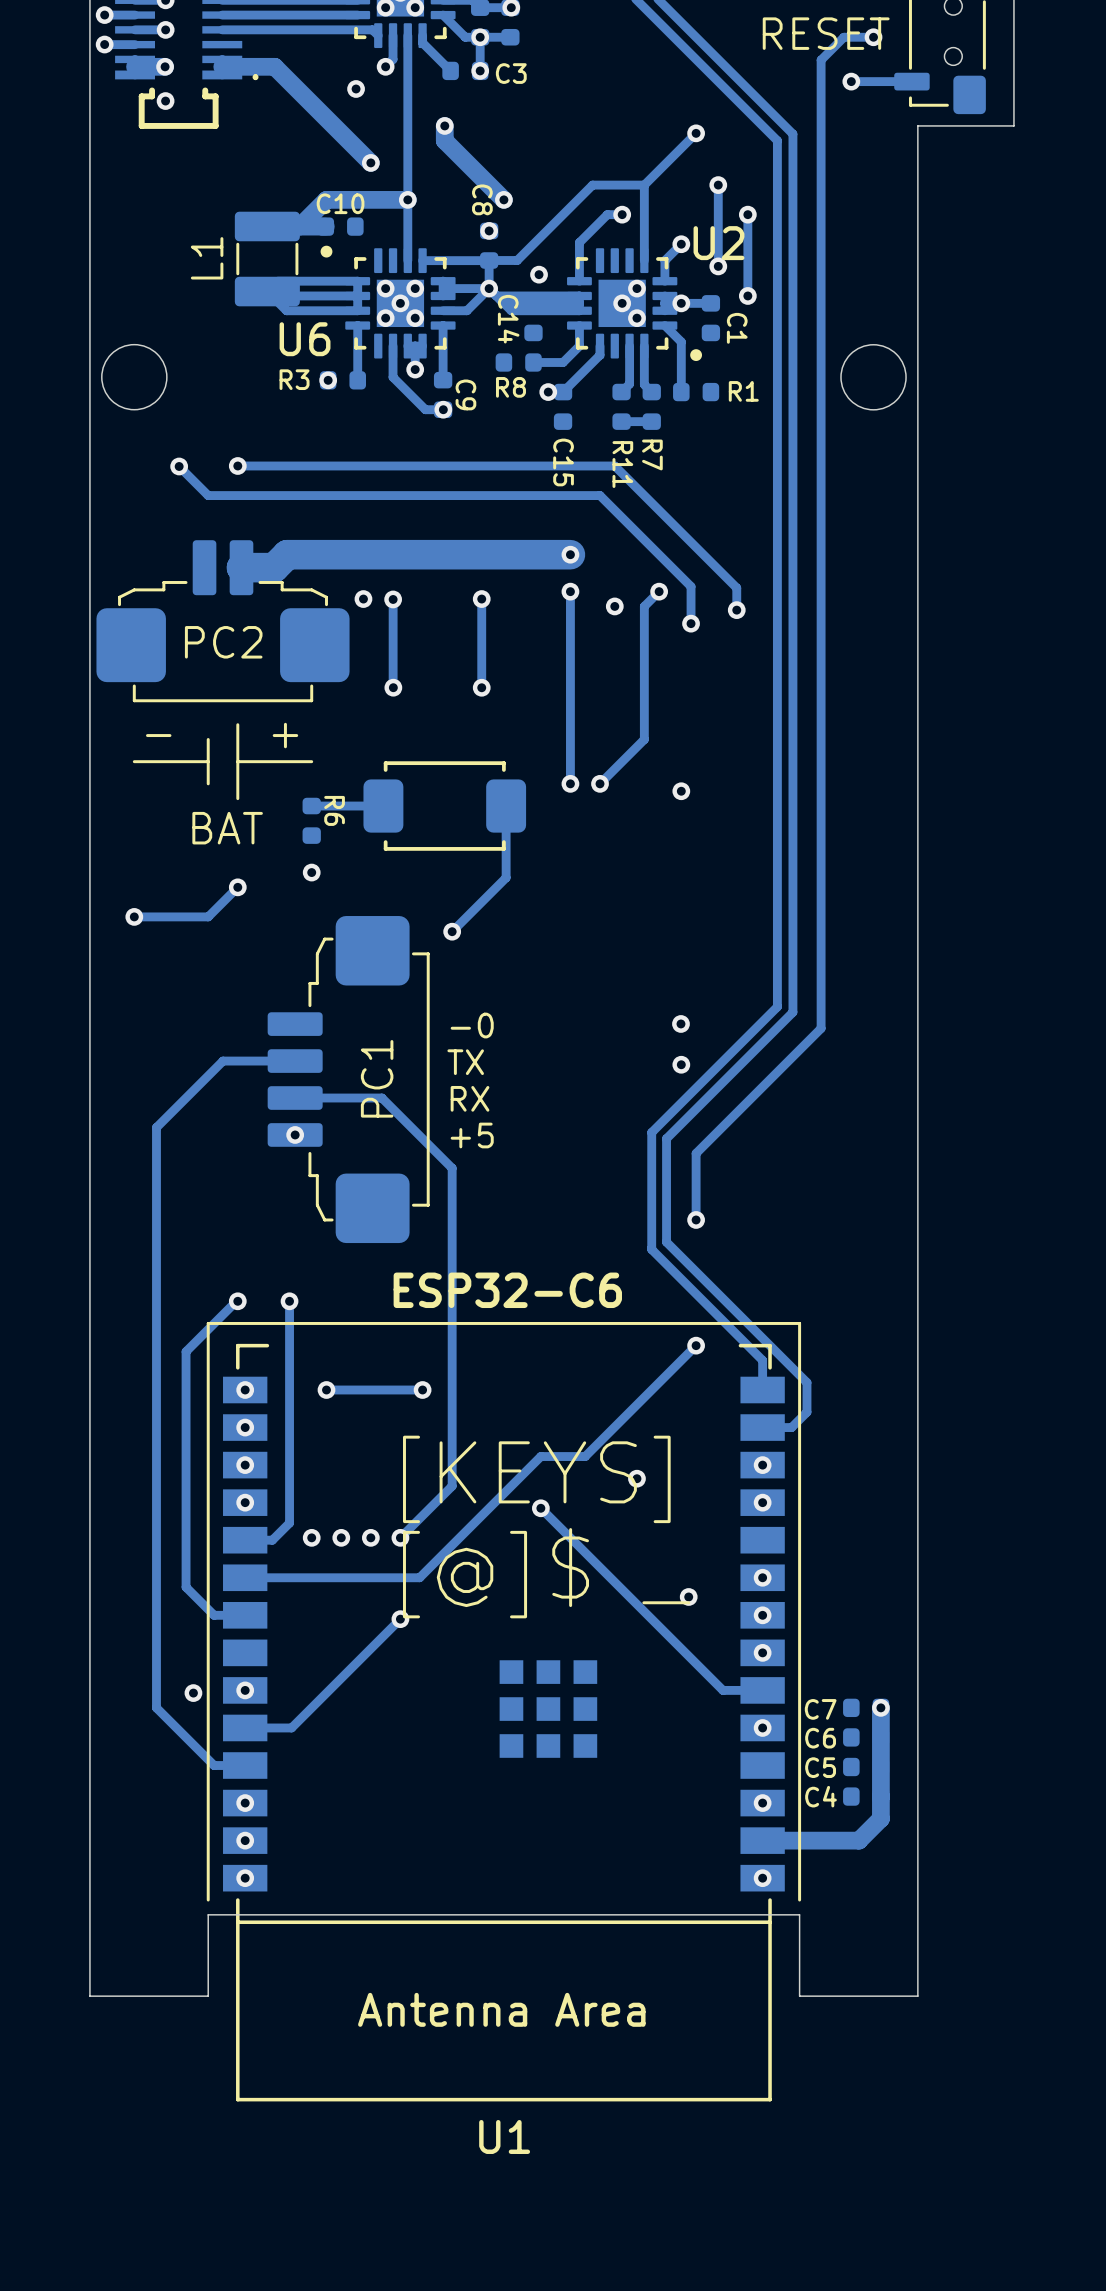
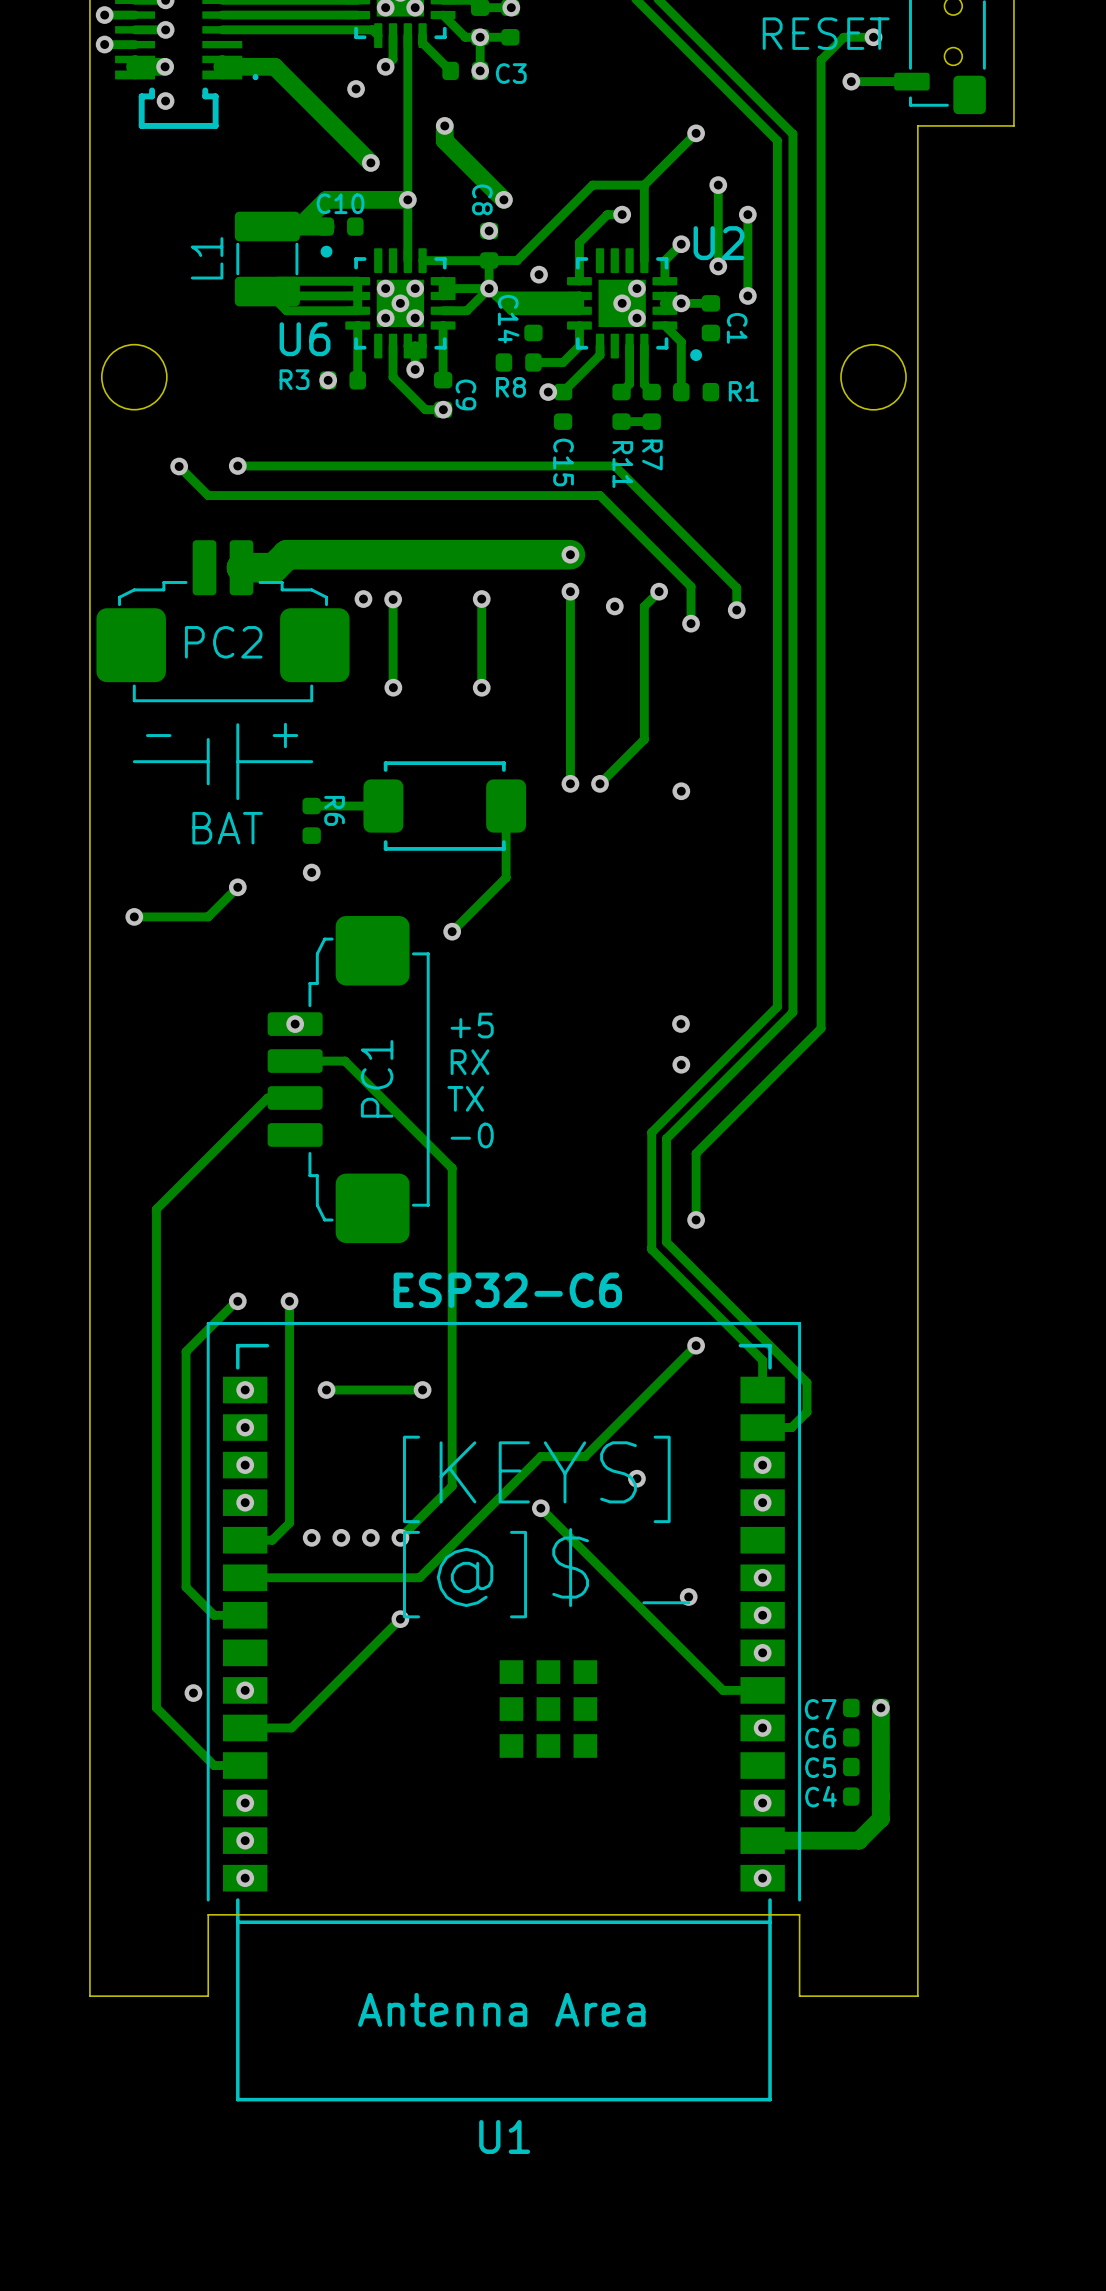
text: -0 (472, 1025) -> +5 (472, 1025)
track: (295, 1061) (223, 1061) (156, 1127) (156, 1209) -> (295, 1098) (267, 1098) (156, 1209)
text: TX (465, 1062) -> RX (470, 1062)
track: (381, 1098) (295, 1098) -> (381, 1098) (344, 1061) (295, 1061)
text: RX (470, 1098) -> TX (465, 1098)
via position: (295, 1134) -> (295, 1024)
text: +5 (472, 1135) -> -0 (472, 1135)

